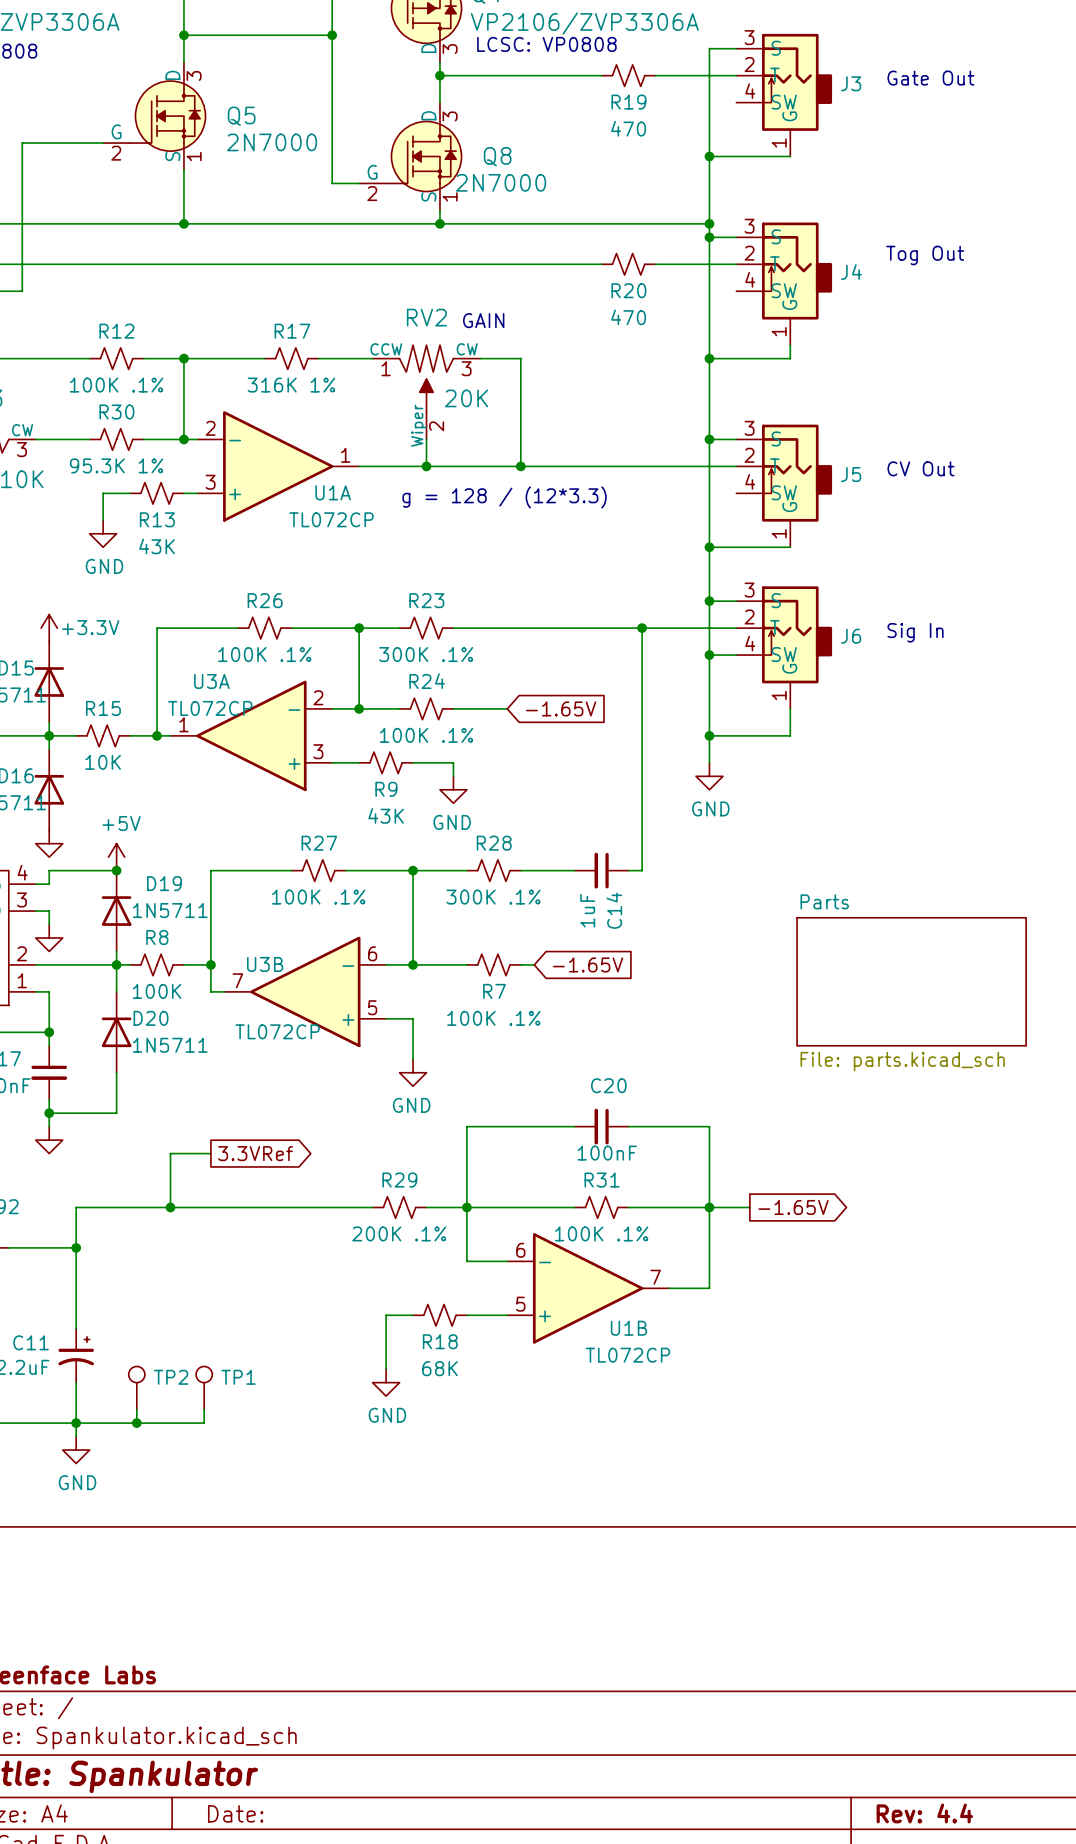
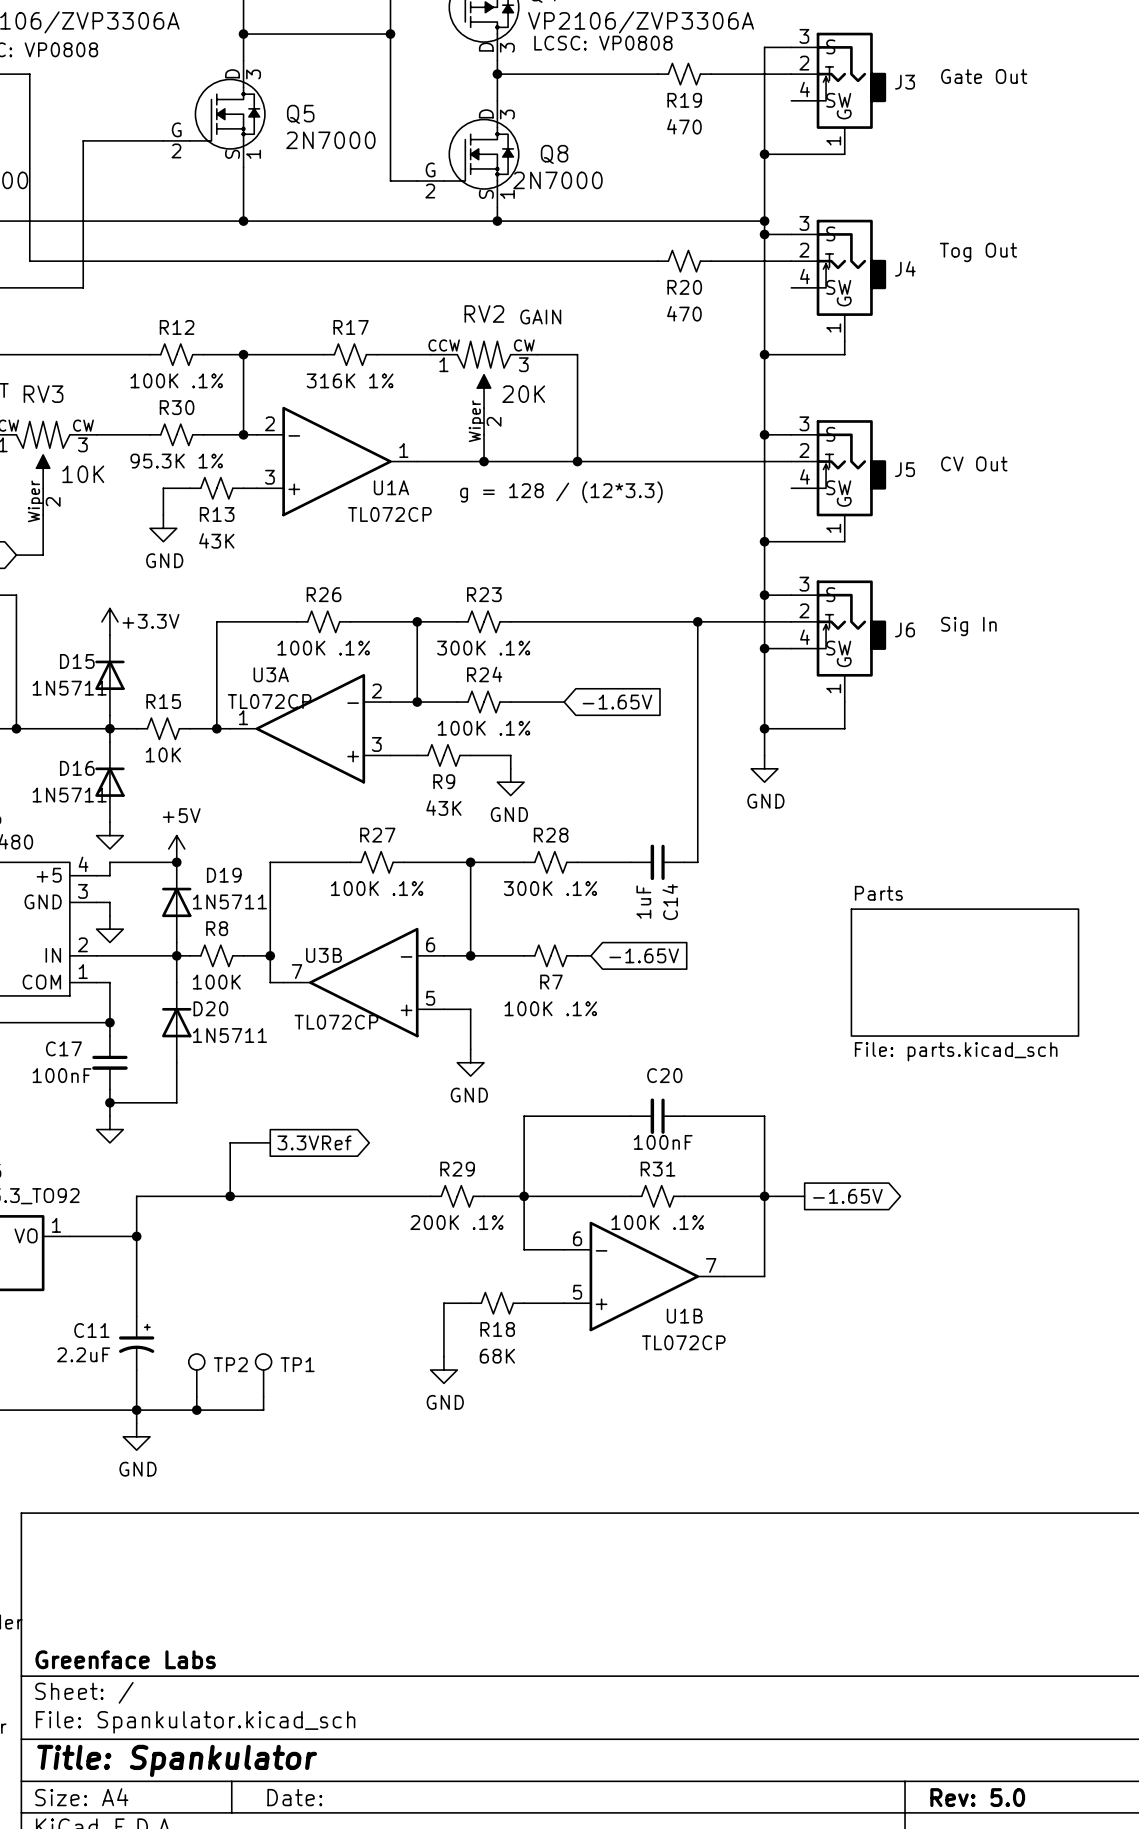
title block: Rev: 4.4 (924, 1813) -> Rev: 5.0 (977, 1797)

